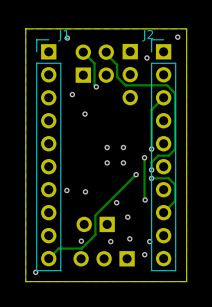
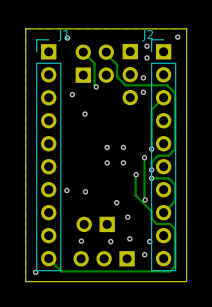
via: none -> (146, 46)
via: none -> (143, 77)
via: none -> (143, 92)
track: (136, 174) (95, 215) (95, 234) (81, 248) (58, 248) (48, 258) -> (135, 176) (135, 195) (151, 211) (151, 218) (156, 223) (170, 223) (175, 228) (175, 266) (170, 271) (61, 271) (48, 258)

